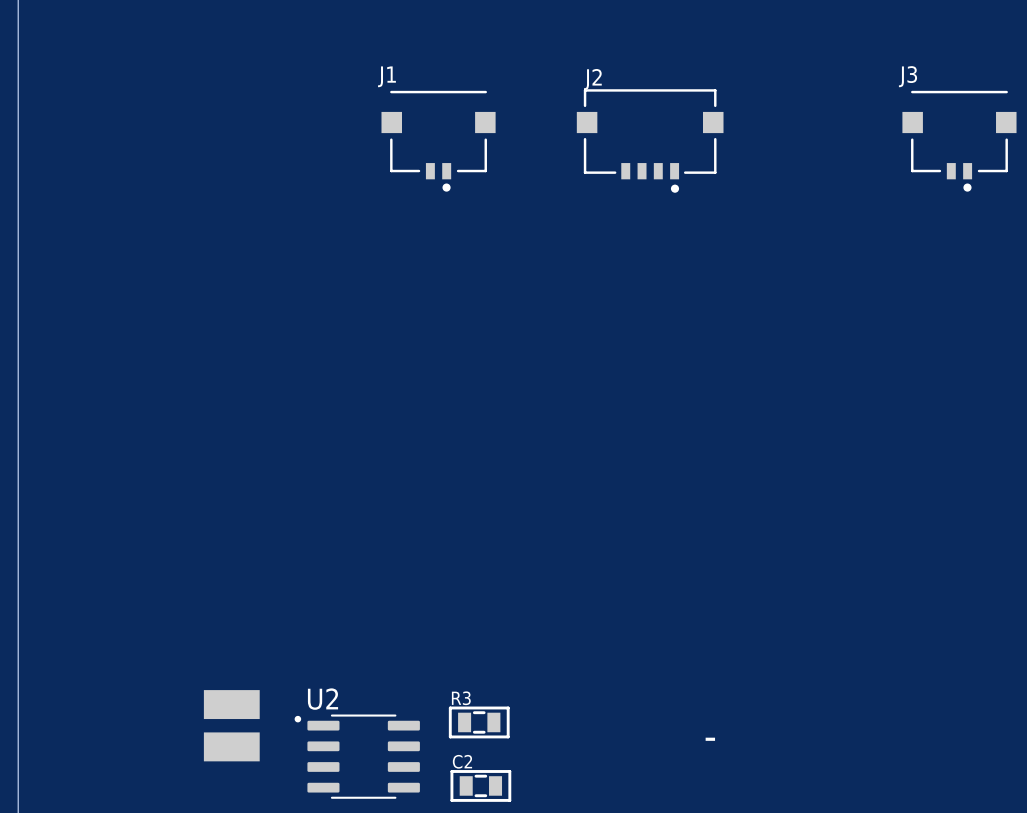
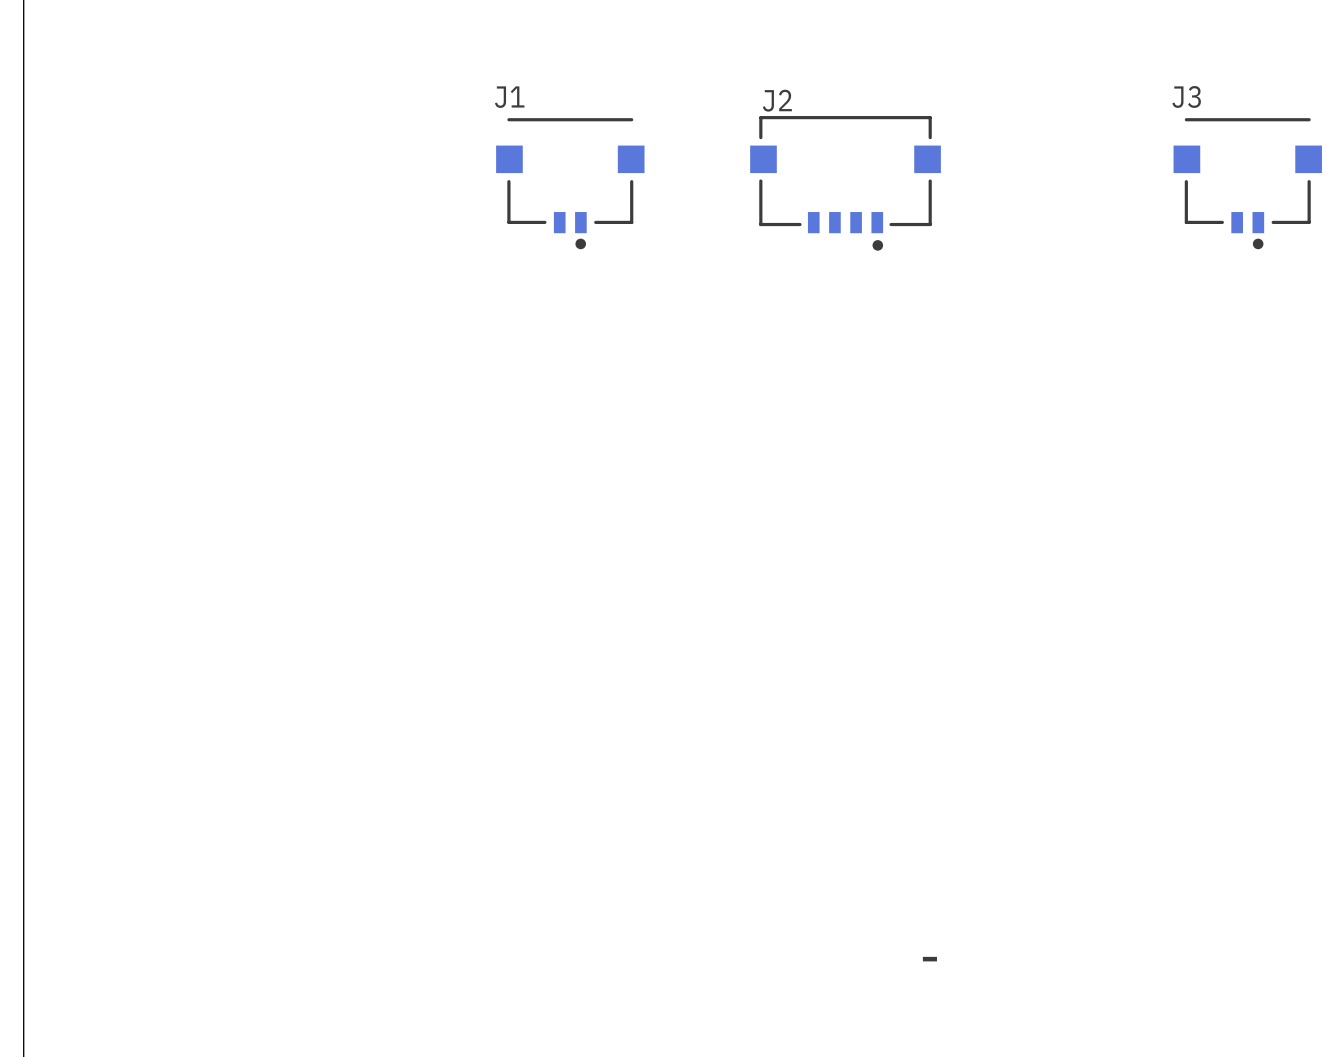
part: (231, 704) -> none
R3: (479, 722) -> none
part: (231, 746) -> none
U2: (357, 756) -> none
C2: (480, 785) -> none

